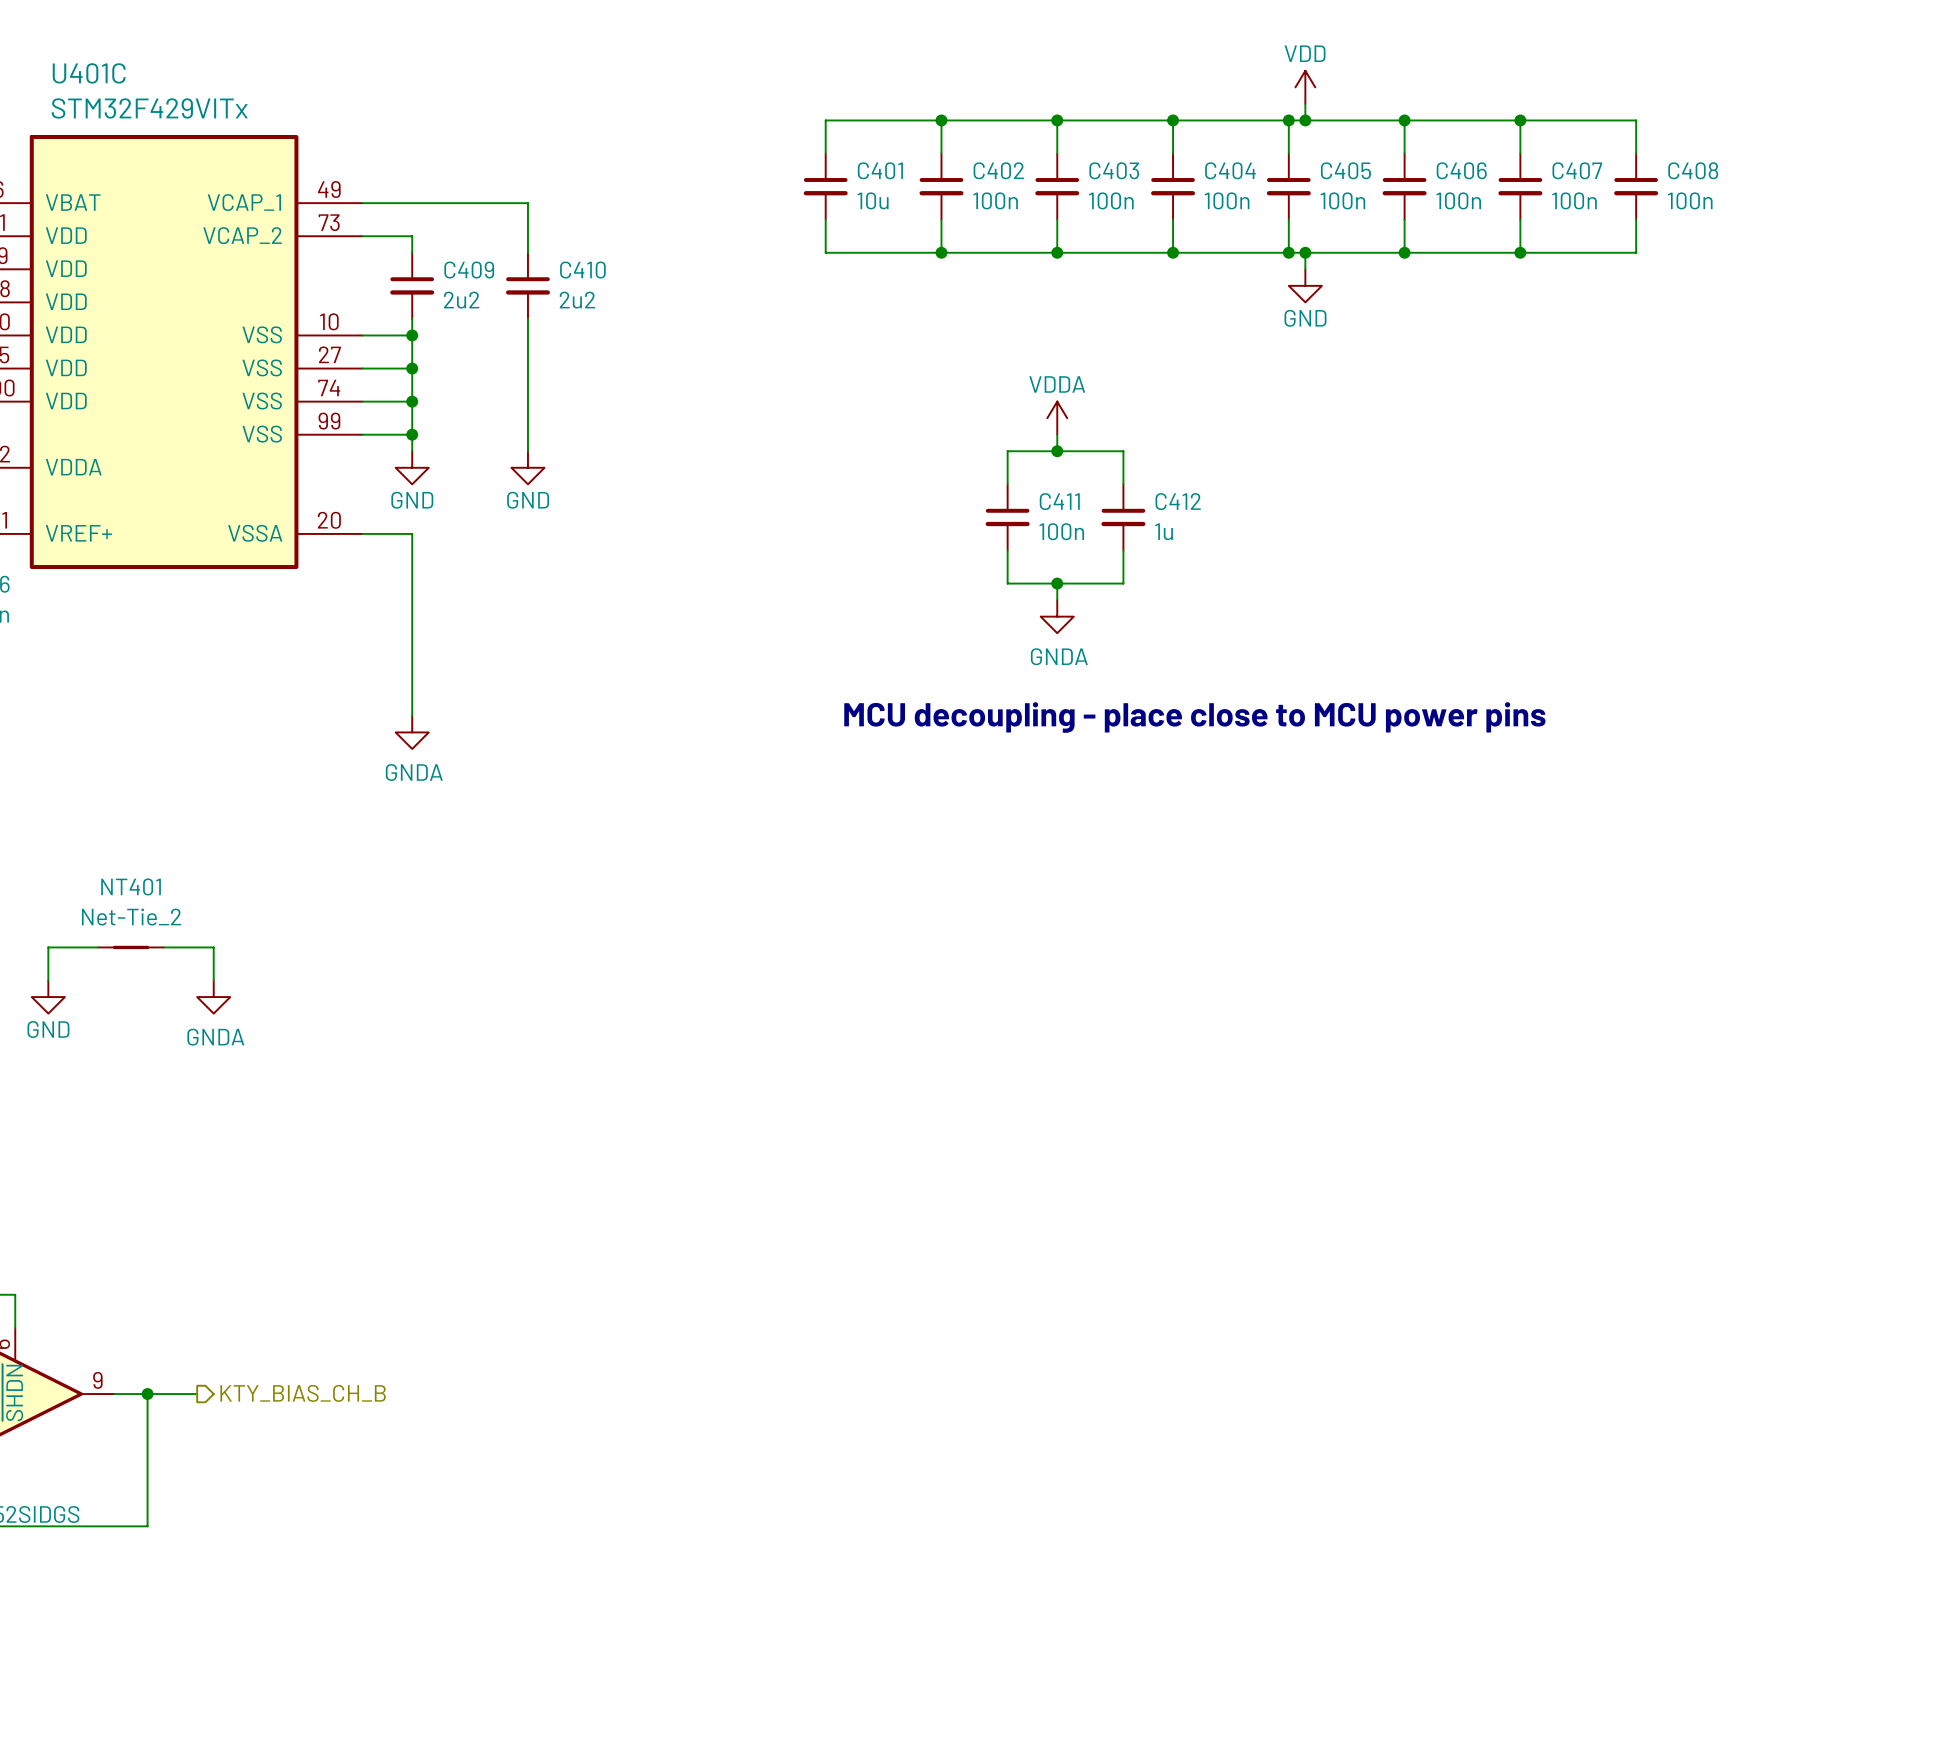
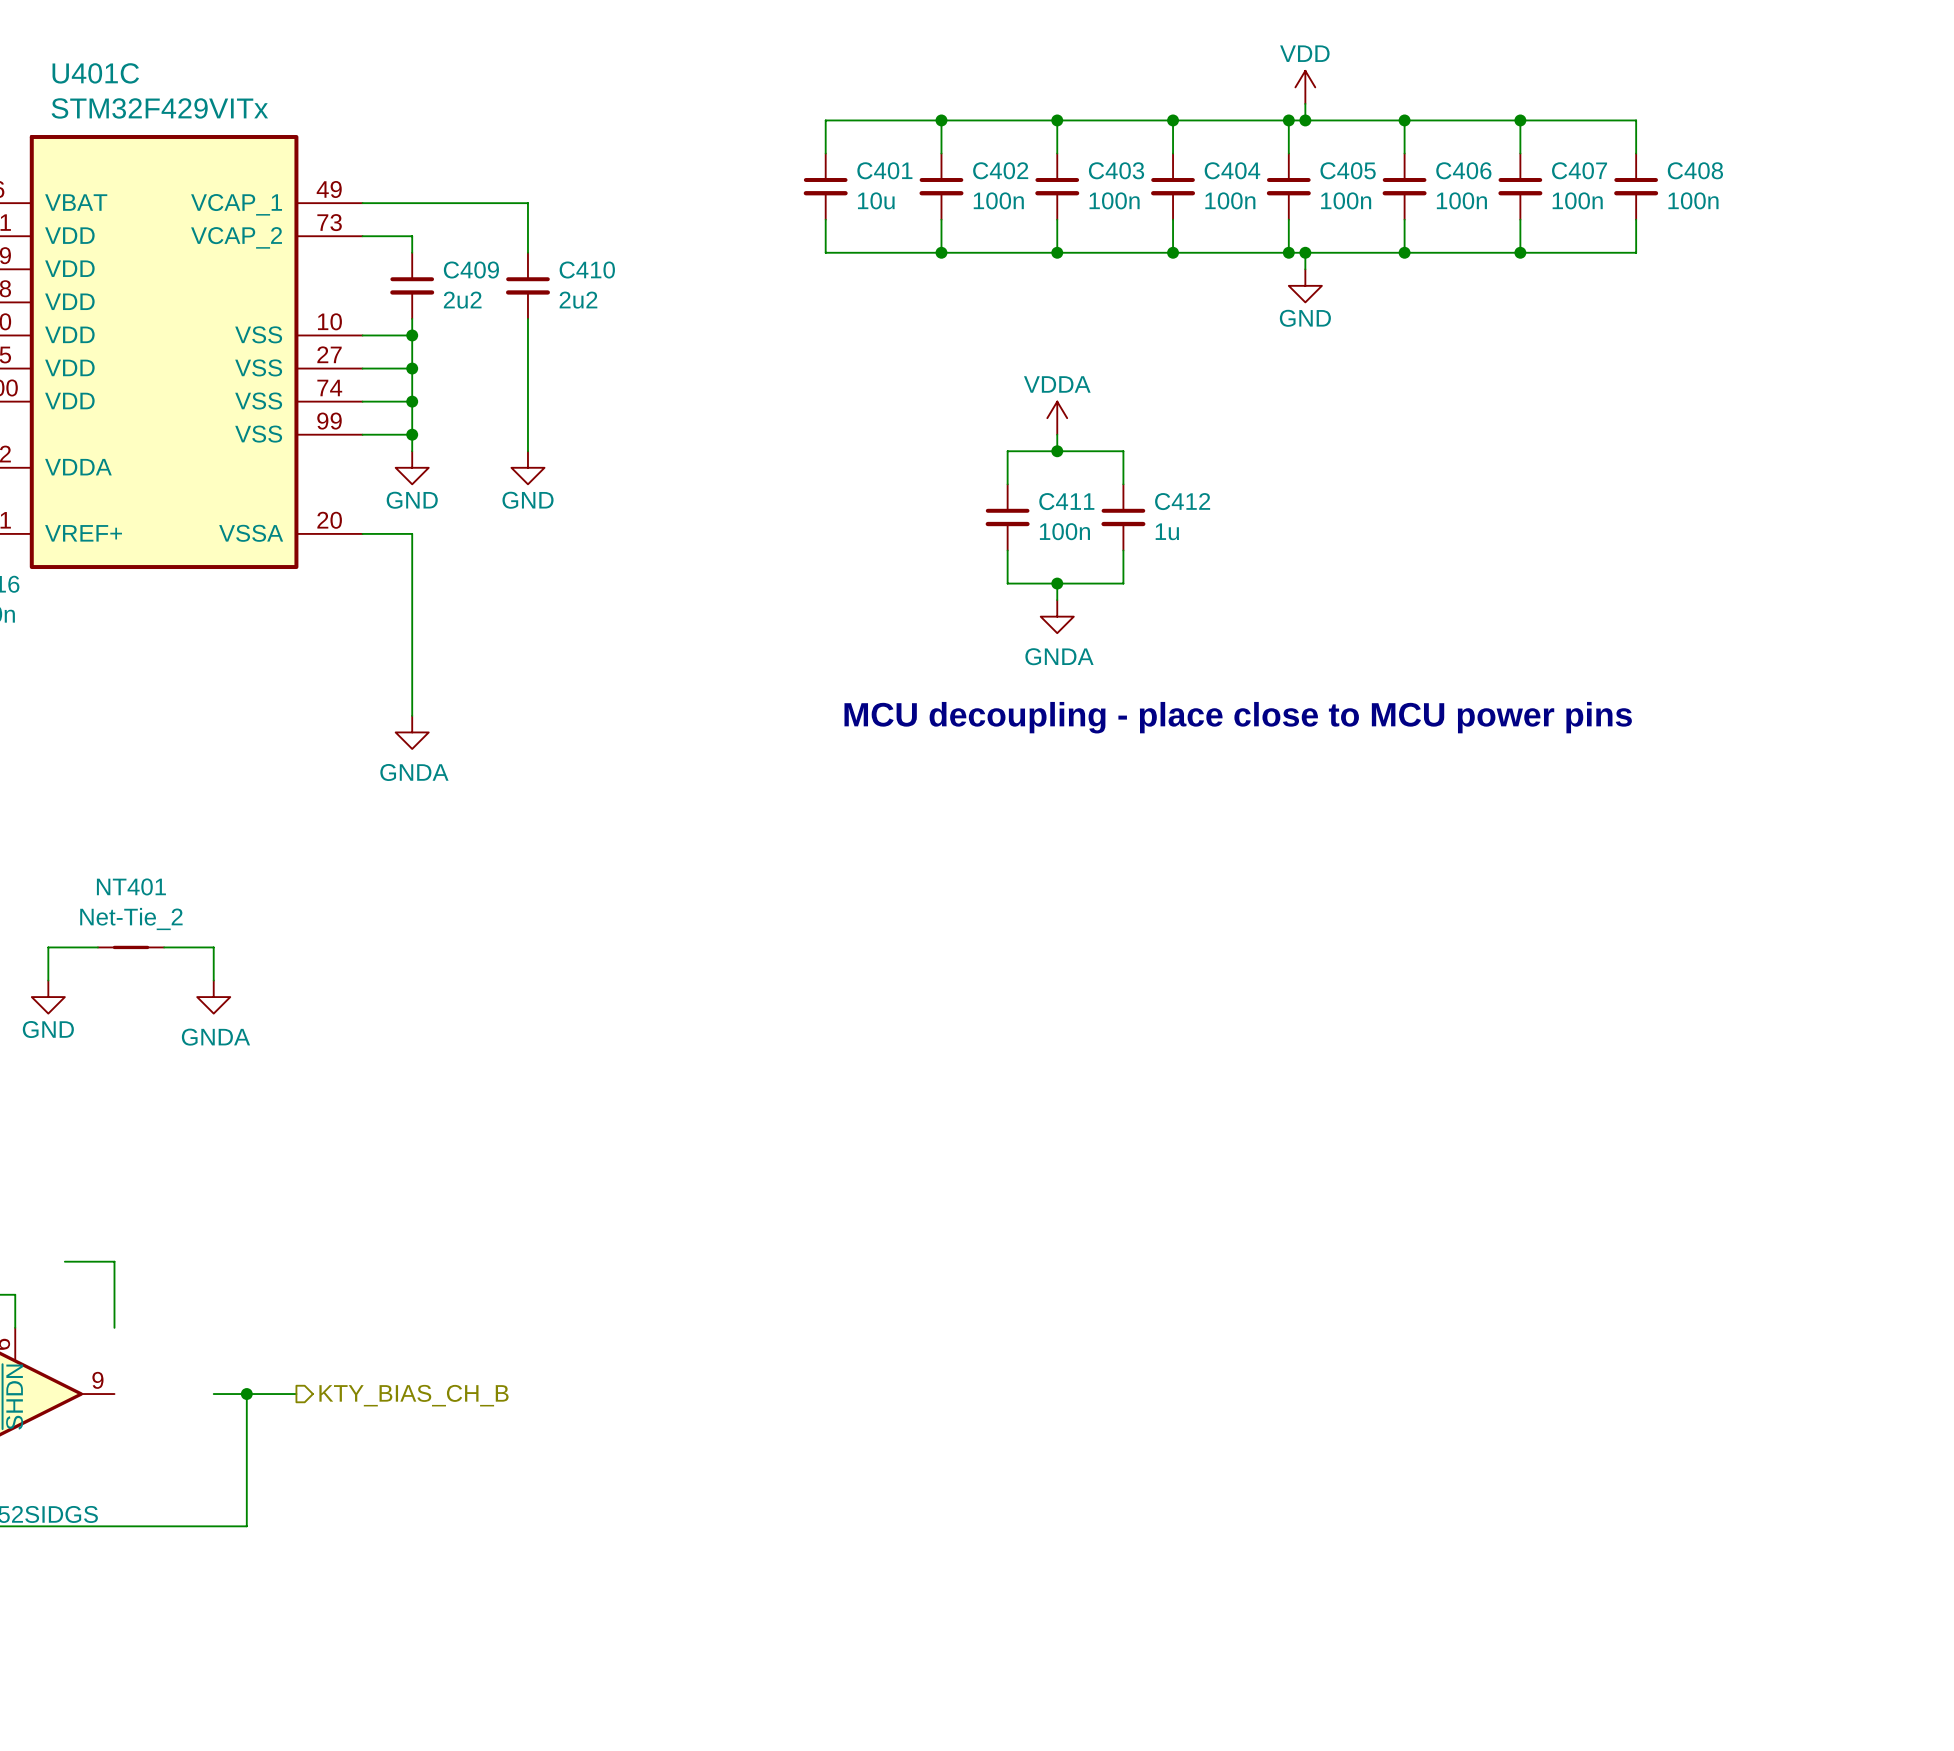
wire: none -> (64, 1261) (114, 1261) (114, 1327)
hierarchical label position: KTY_BIAS_CH_B (303, 1393) -> KTY_BIAS_CH_B (413, 1395)
wire: (114, 1394) (197, 1394) -> (213, 1394) (296, 1394)
wire: (147, 1394) (147, 1526) -> (246, 1394) (246, 1526) (147, 1526)
junction: (147, 1394) -> none
junction: none -> (246, 1394)

